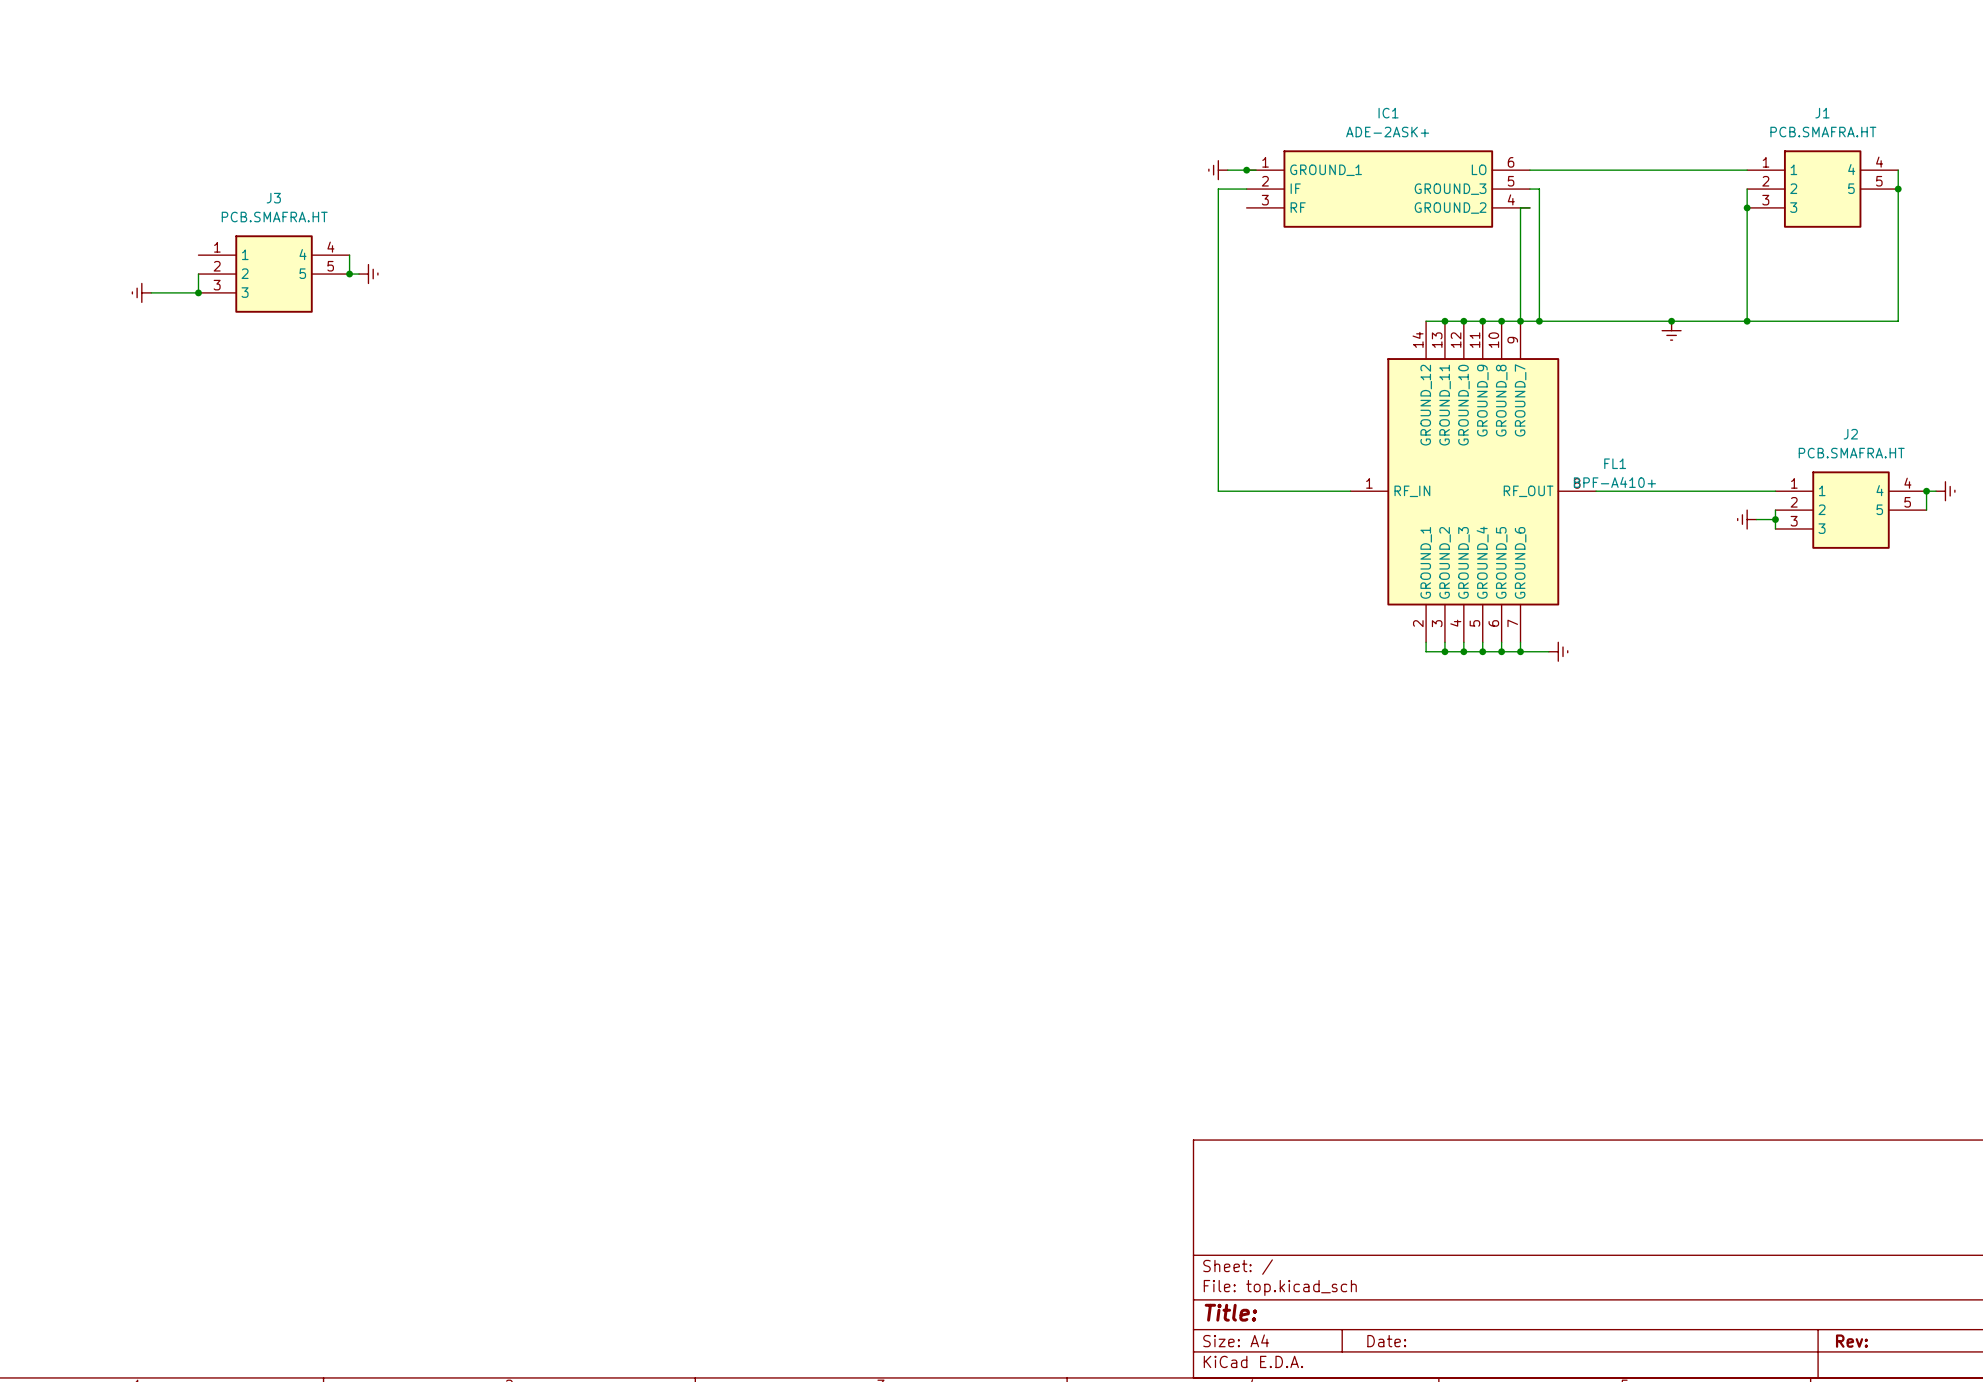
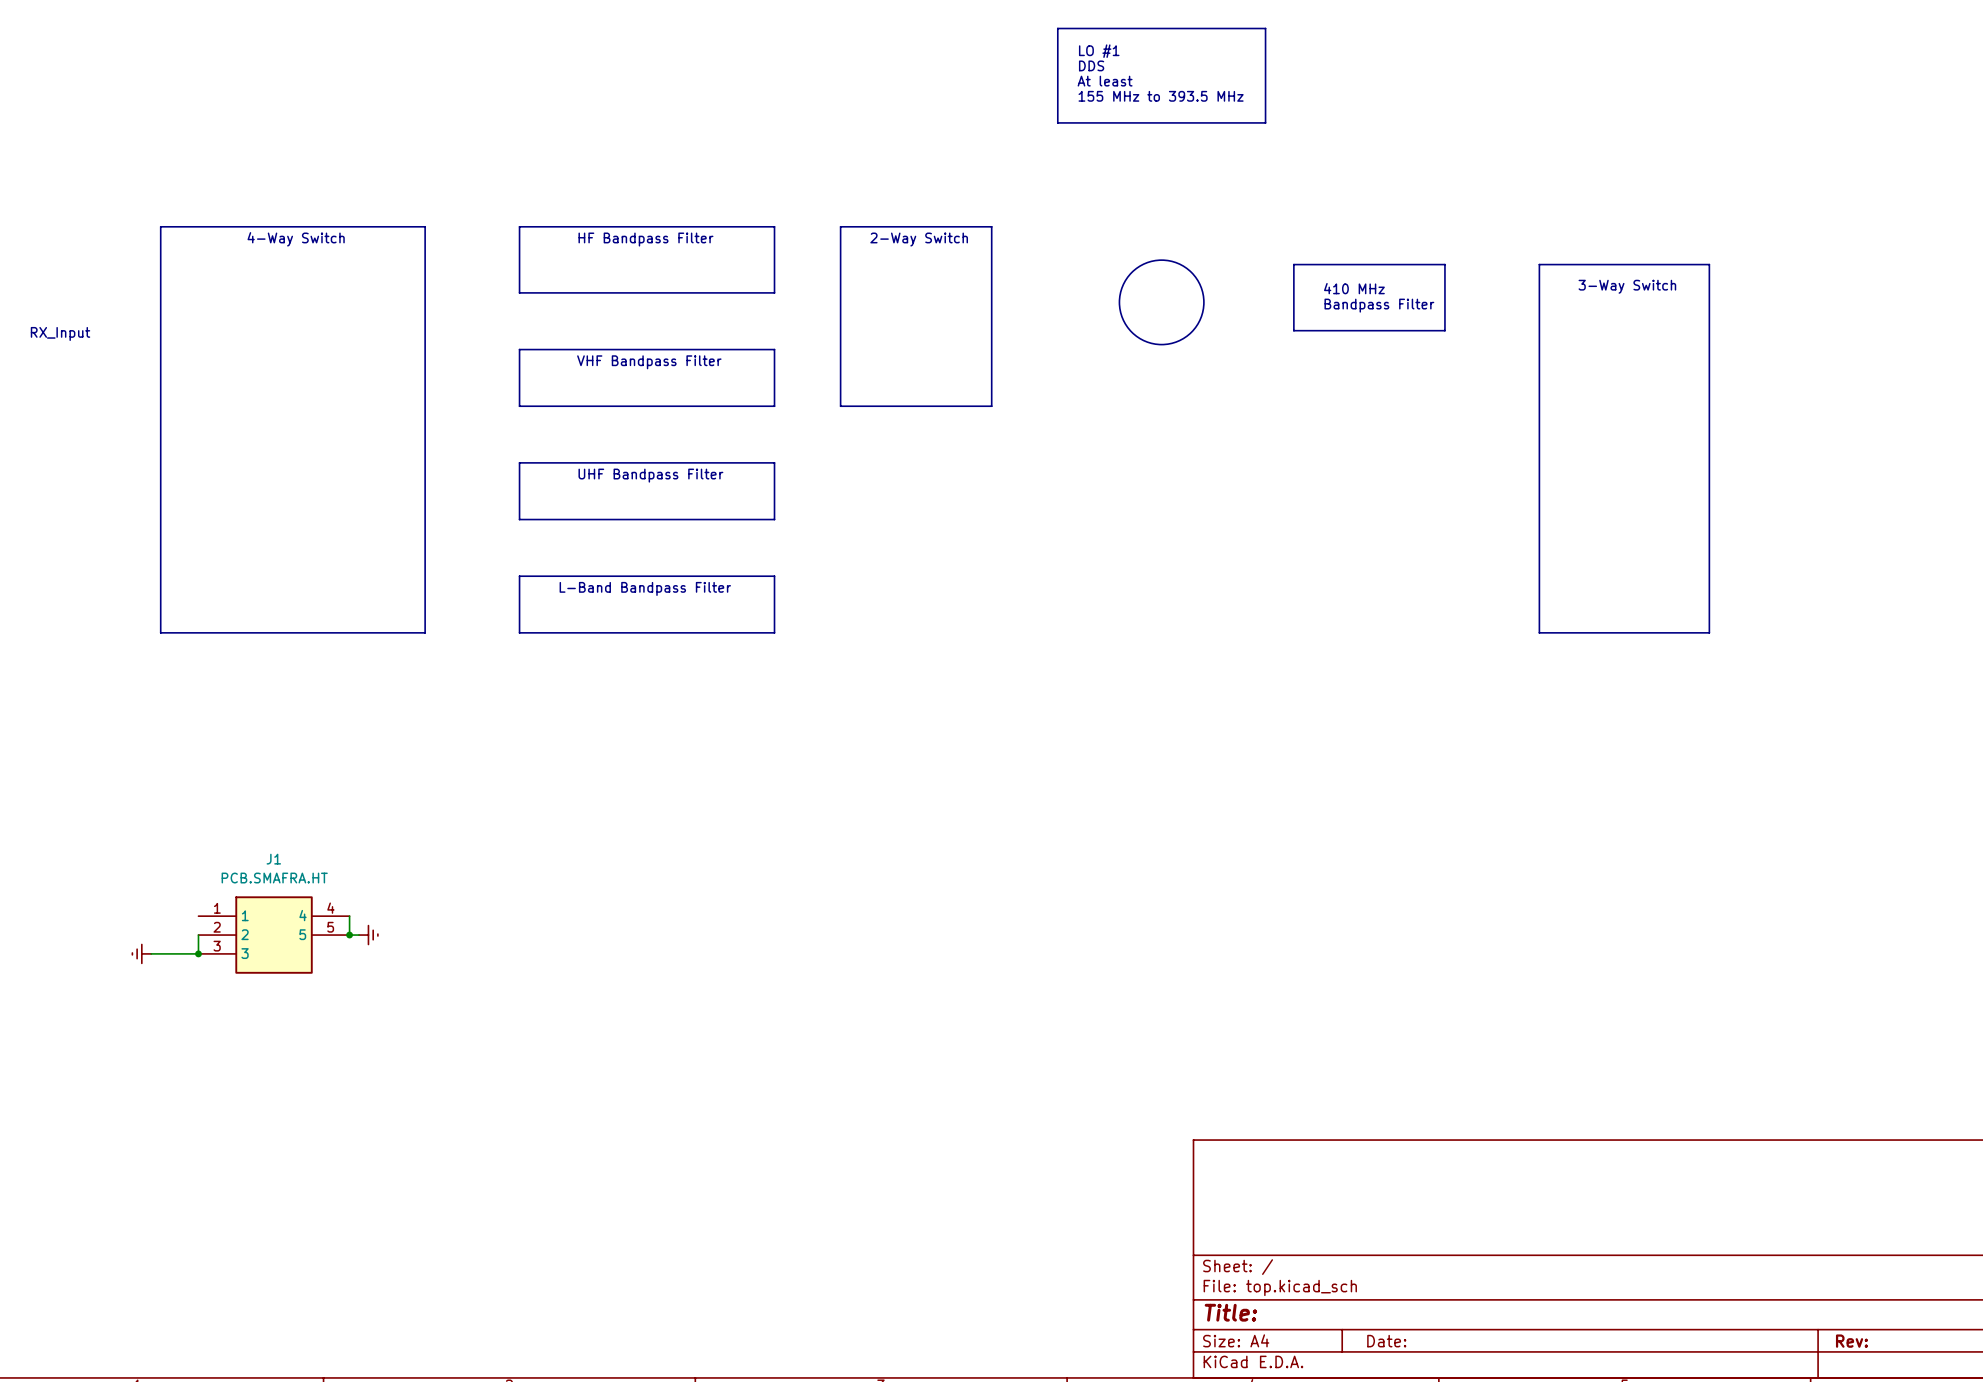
line: none -> (1057, 28) (1265, 28) (1265, 122) (1057, 122) (1057, 28)
text: none -> LO #1 (1099, 51)
text: none -> DDS (1091, 65)
text: none -> At least (1105, 81)
text: none -> 155 MHz to 393.5 MHz (1161, 96)
power symbol: (1218, 170) -> none
wire: (1227, 170) (1256, 170) -> none
junction: (1246, 170) -> none
wire: (1529, 170) (1747, 170) -> none
wire: (1898, 170) (1898, 321) (1426, 321) -> none
wire: (1246, 189) (1218, 189) (1218, 491) (1350, 491) -> none
IC1: ADE-2ASK+ (1388, 189) -> none
wire: (1529, 189) (1539, 189) (1539, 321) -> none
wire: (1747, 189) (1747, 321) -> none
J1 position: (1822, 189) -> (274, 935)
junction: (1898, 189) -> none
wire: (1529, 207) (1520, 207) (1520, 321) -> none
junction: (1747, 207) -> none
line: none -> (160, 226) (425, 226) (425, 632) (160, 632) (160, 226)
line: none -> (519, 226) (519, 292) (774, 292) (774, 226) (519, 226)
line: none -> (840, 226) (991, 226) (991, 406) (840, 406) (840, 226)
text: none -> 4-Way Switch (296, 239)
text: none -> HF Bandpass Filter (645, 239)
text: none -> 2-Way Switch (919, 239)
wire: (349, 255) (349, 274) (359, 274) -> none
drawing: none -> [1119, 260, 1204, 345]
line: none -> (1293, 264) (1444, 264) (1444, 330) (1293, 330) (1293, 264)
line: none -> (1539, 264) (1709, 264) (1709, 632) (1539, 632) (1539, 264)
wire: (198, 274) (198, 292) (151, 292) -> none
J3: PCB.SMAFRA.HT (274, 274) -> none
junction: (349, 274) -> none
power symbol: (368, 274) -> none
text: none -> 3-Way Switch (1627, 286)
text: none -> 410 MHz (1354, 288)
power symbol: (141, 292) -> none
junction: (198, 292) -> none
text: none -> Bandpass Filter (1379, 305)
junction: (1444, 321) -> none
junction: (1463, 321) -> none
junction: (1482, 321) -> none
junction: (1501, 321) -> none
junction: (1520, 321) -> none
junction: (1539, 321) -> none
junction: (1671, 321) -> none
junction: (1747, 321) -> none
power symbol: (1671, 330) -> none
text: none -> RX_Input (60, 333)
line: none -> (519, 349) (519, 406) (774, 406) (774, 349) (519, 349)
text: none -> VHF Bandpass Filter (649, 362)
line: none -> (519, 462) (774, 462) (774, 519) (519, 519) (519, 462)
text: none -> UHF Bandpass Filter (650, 475)
FL1: BPF-A410+ (1473, 481) -> none
wire: (1596, 491) (1775, 491) -> none
junction: (1926, 491) -> none
wire: (1936, 491) (1926, 491) (1926, 510) -> none
power symbol: (1945, 491) -> none
wire: (1775, 510) (1775, 528) -> none
J2: PCB.SMAFRA.HT (1851, 510) -> none
power symbol: (1747, 519) -> none
wire: (1756, 519) (1775, 519) -> none
junction: (1775, 519) -> none
line: none -> (519, 576) (519, 632) (774, 632) (774, 576) (519, 576)
text: none -> L-Band Bandpass Filter (645, 588)
wire: (1426, 642) (1426, 651) (1548, 651) -> none
wire: (1444, 642) (1444, 651) -> none
wire: (1463, 642) (1463, 651) -> none
wire: (1482, 642) (1482, 651) -> none
wire: (1501, 642) (1501, 651) -> none
wire: (1520, 642) (1520, 651) -> none
junction: (1444, 651) -> none
junction: (1463, 651) -> none
junction: (1482, 651) -> none
junction: (1501, 651) -> none
junction: (1520, 651) -> none
power symbol: (1558, 651) -> none
wire: none -> (349, 916) (349, 935) (359, 935)
wire: none -> (198, 935) (198, 953) (151, 953)
junction: none -> (349, 935)
power symbol: none -> (368, 935)
power symbol: none -> (141, 953)
junction: none -> (198, 953)

